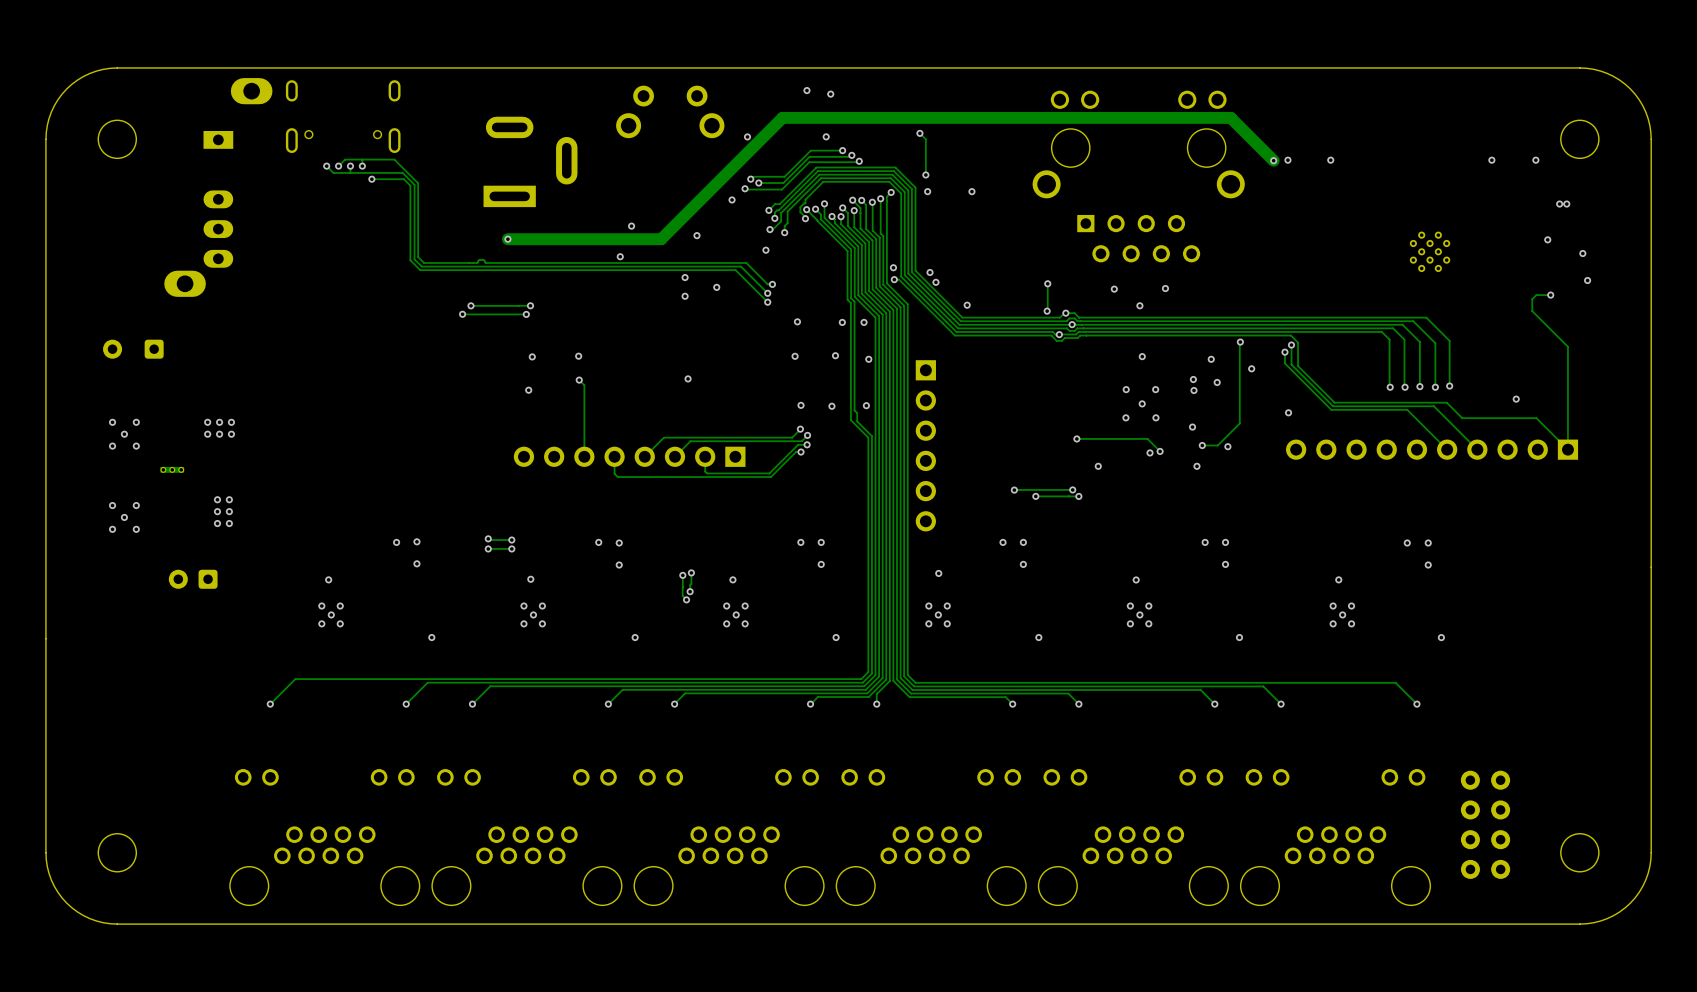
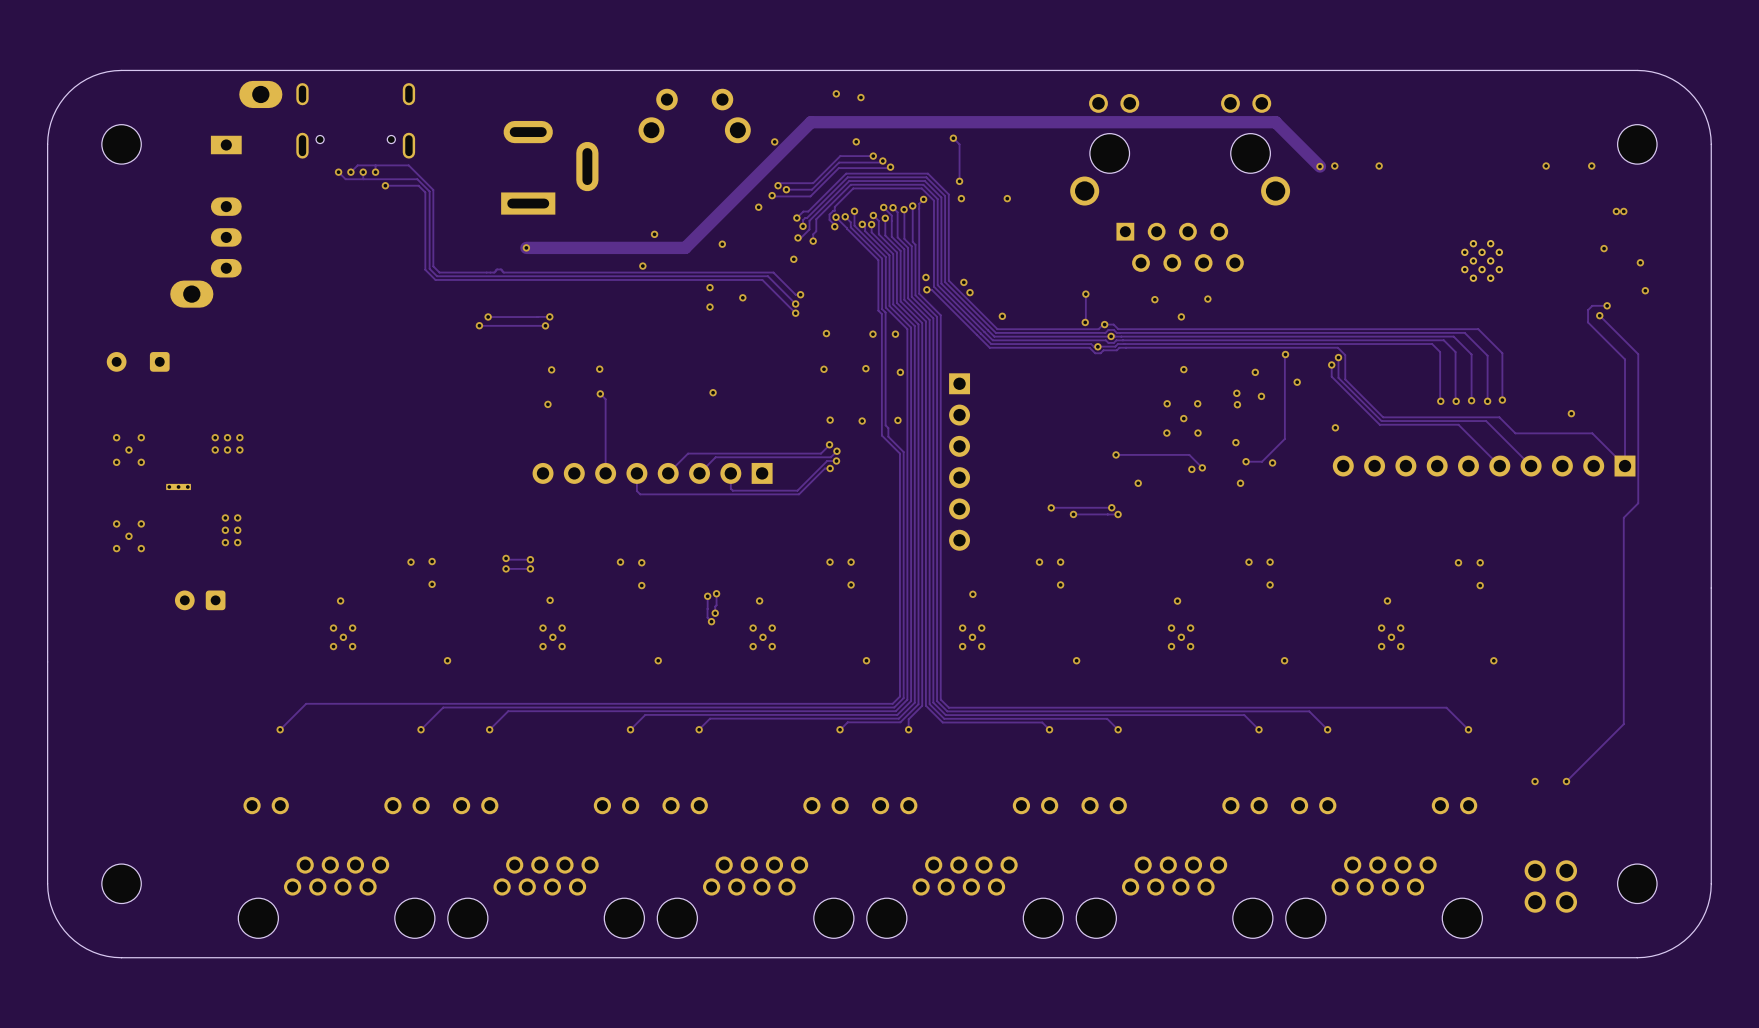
track: none -> (1599, 315) (1638, 354) (1638, 503) (1623, 517) (1623, 724) (1566, 781)
via: none -> (1599, 315)
via: none -> (1535, 781)
via: none -> (1566, 781)
part: (1485, 824) -> none
part: none -> (1550, 886)

